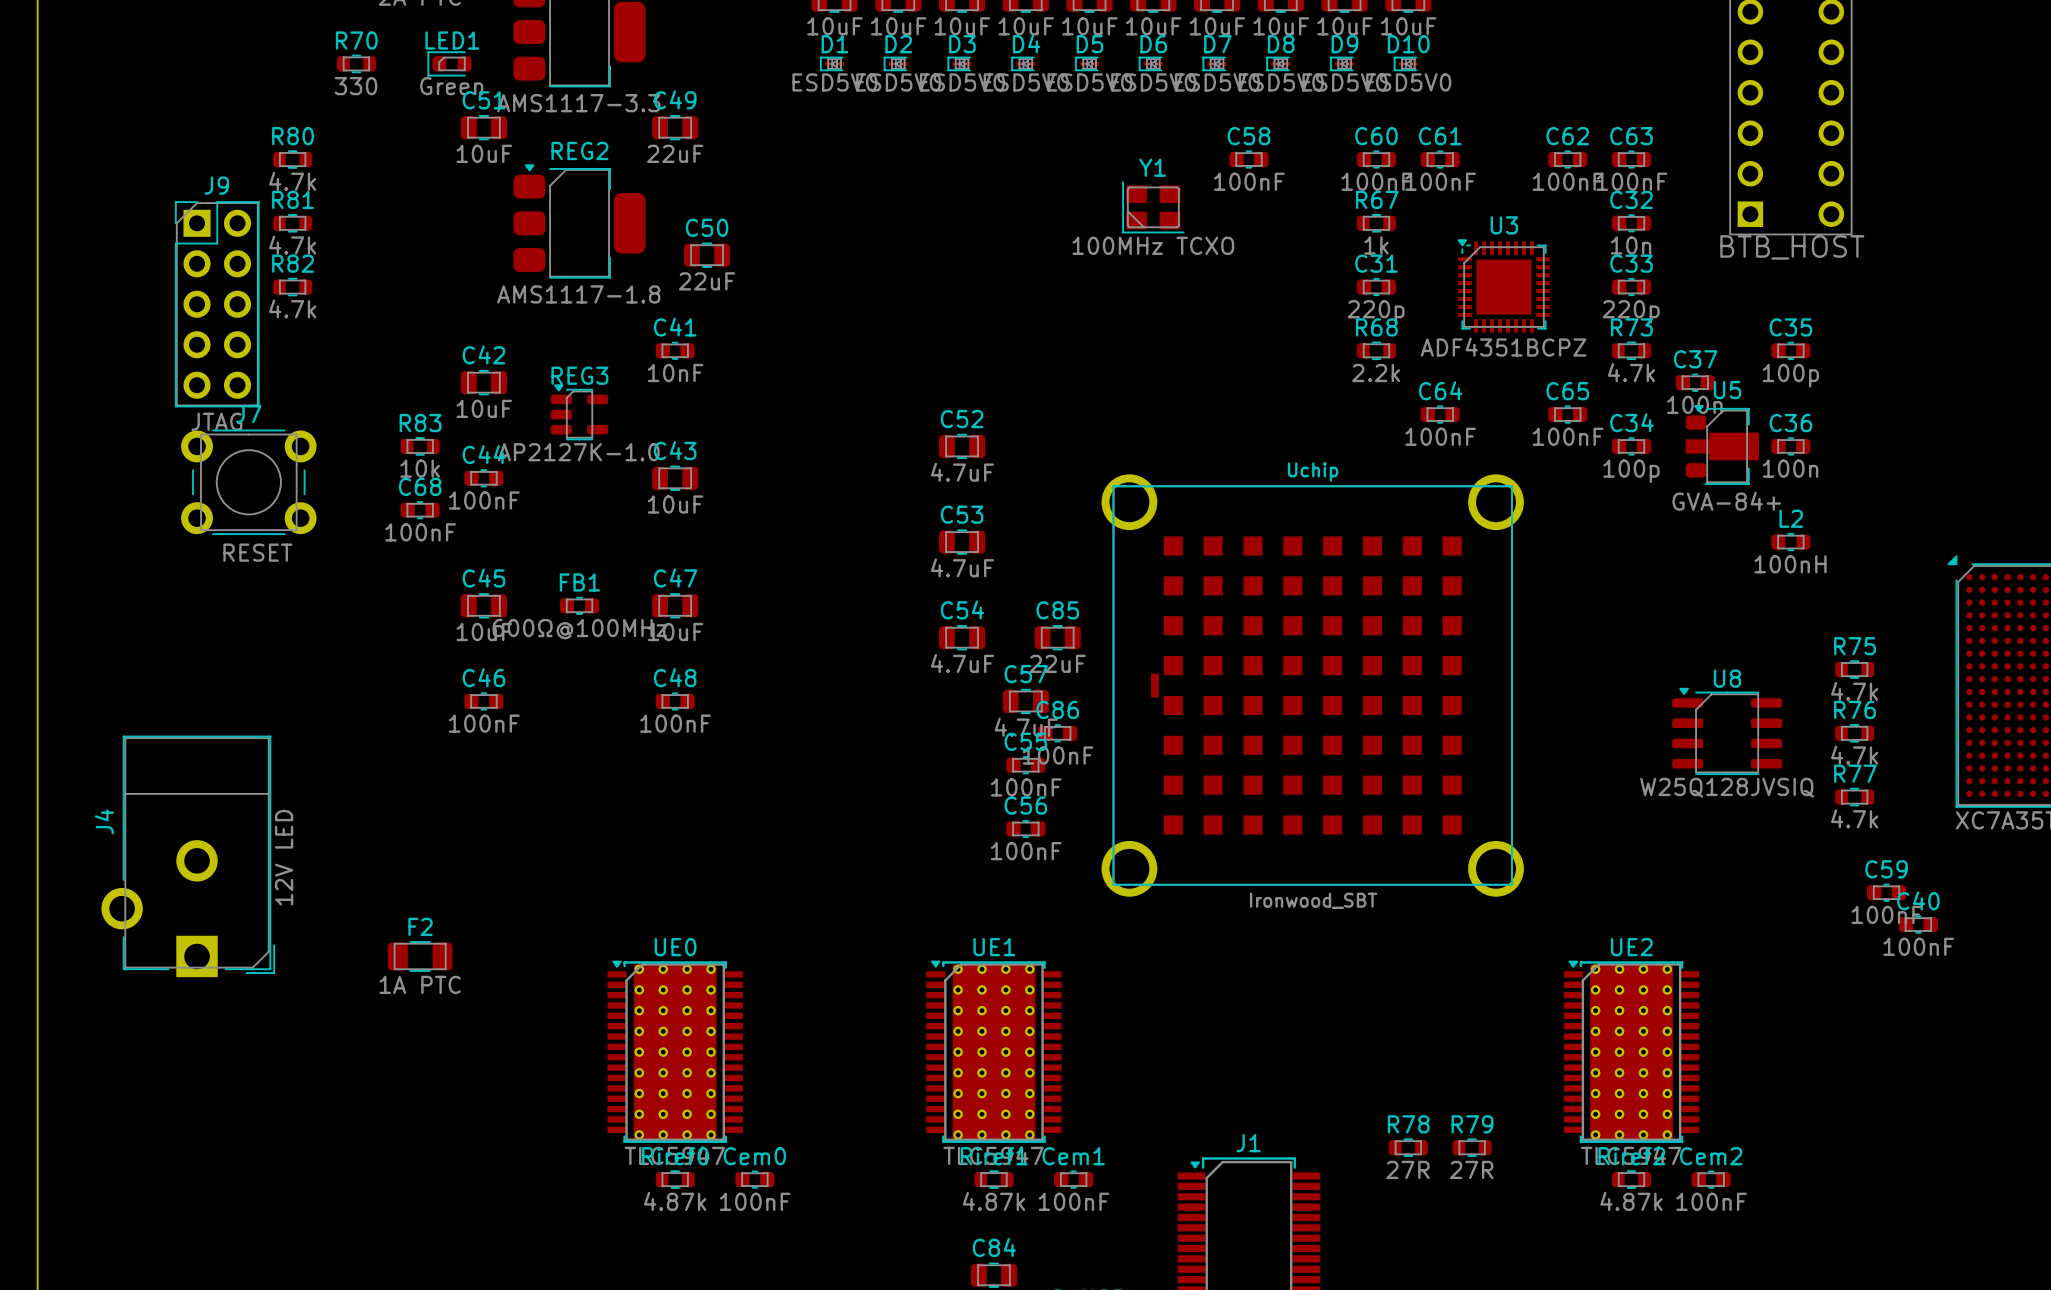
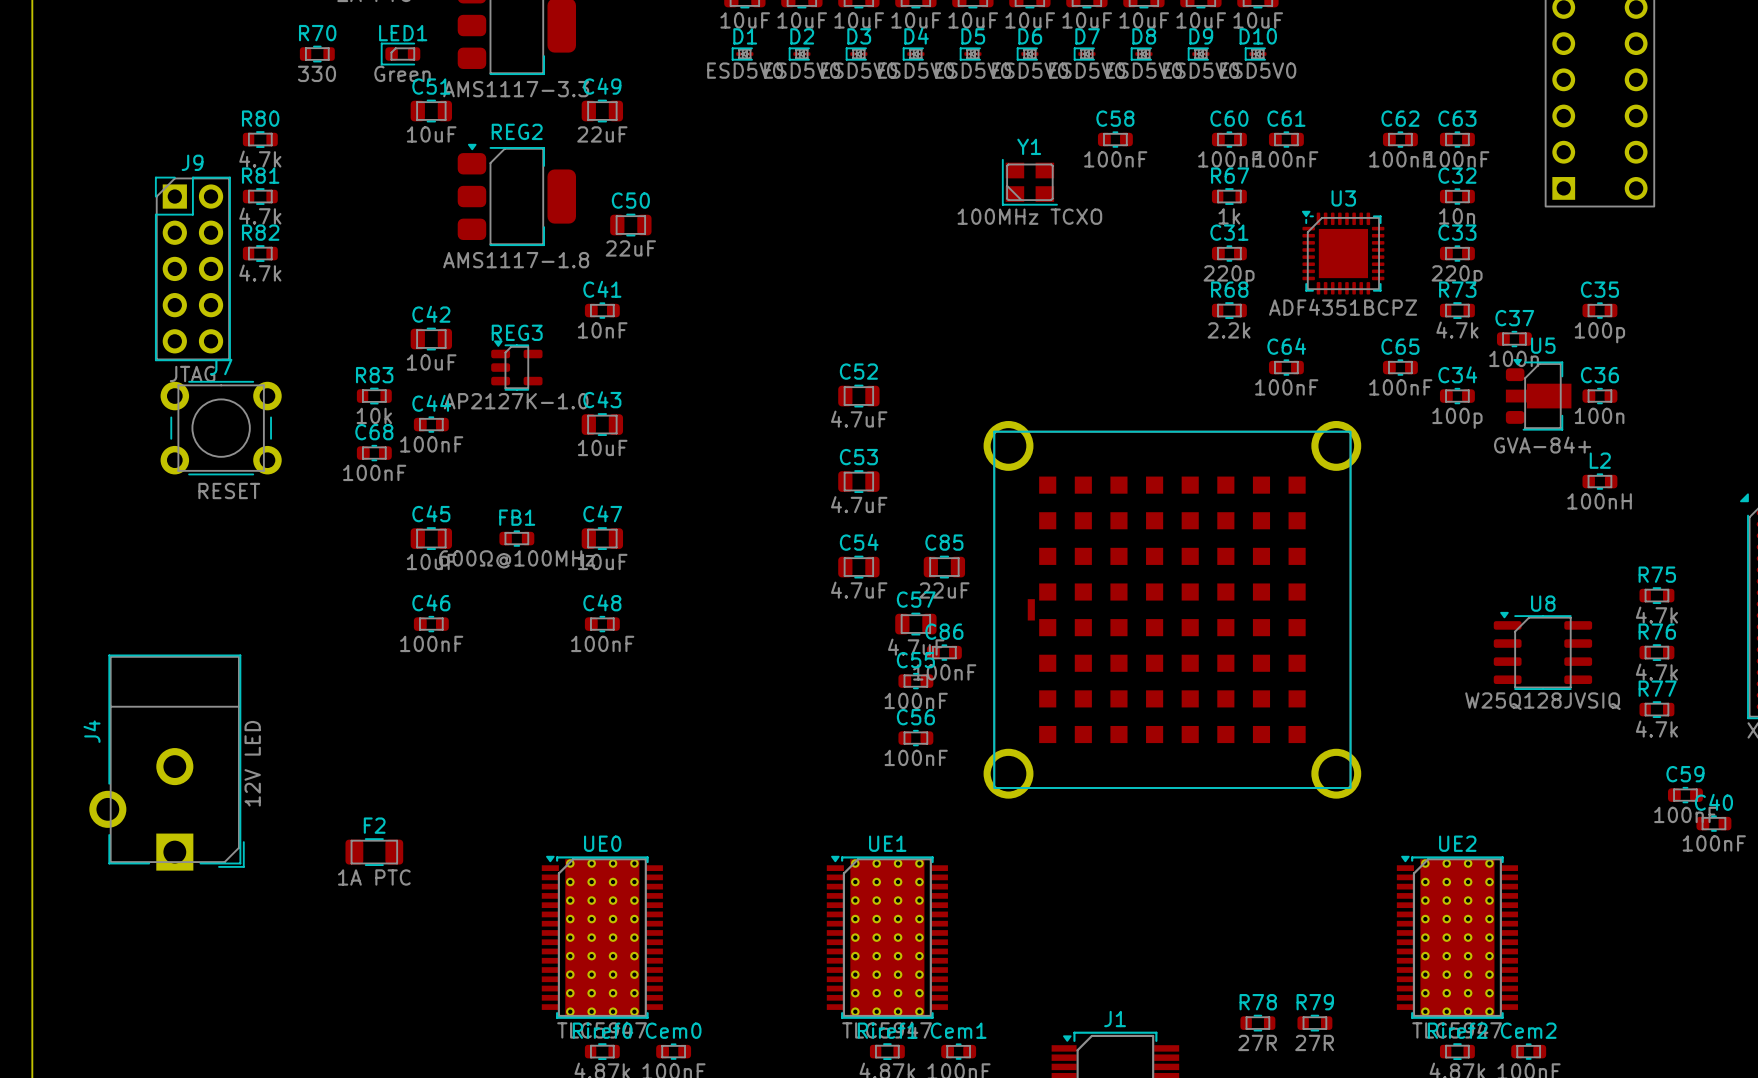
part value: BTB_HOST (1792, 247) -> none
Uchip name: Uchip (1313, 472) -> none
Uchip value: Ironwood_SBT (1313, 900) -> none

